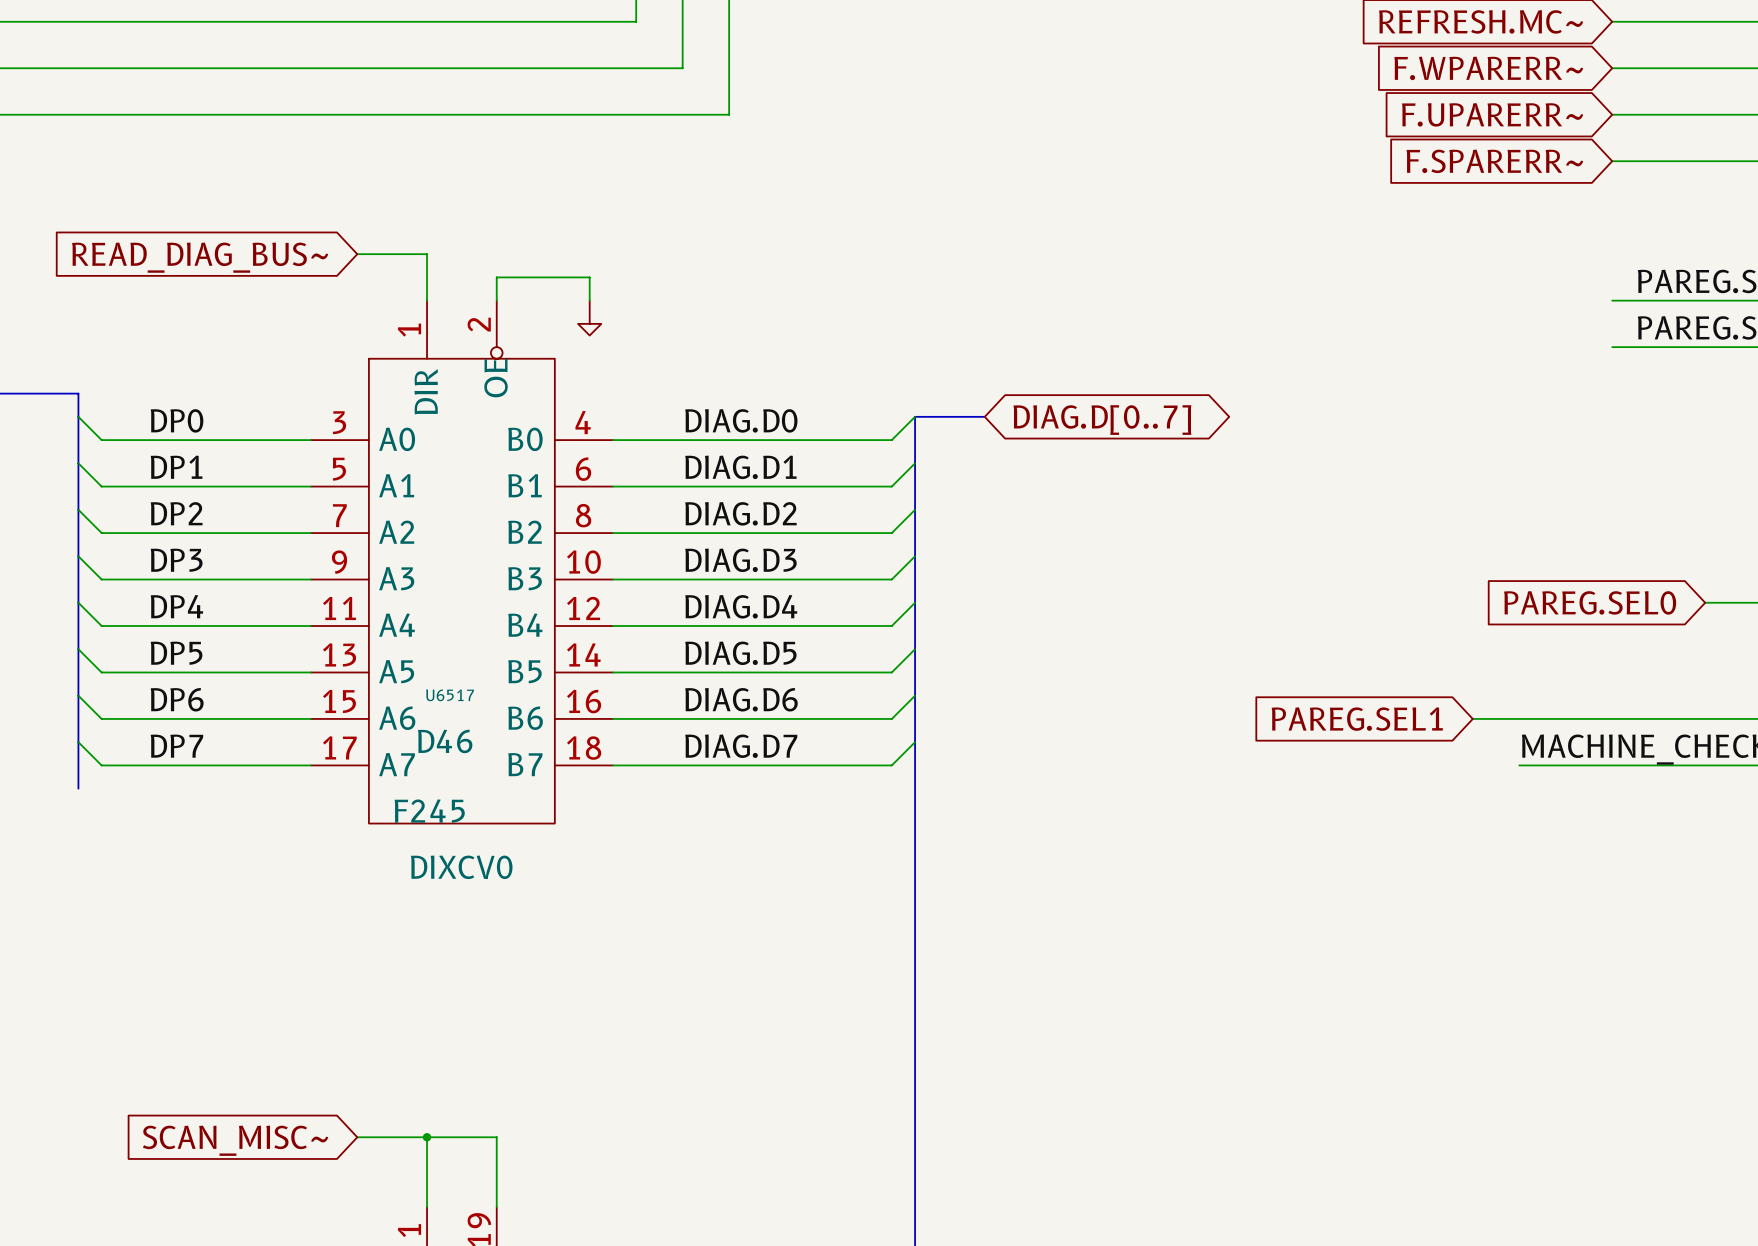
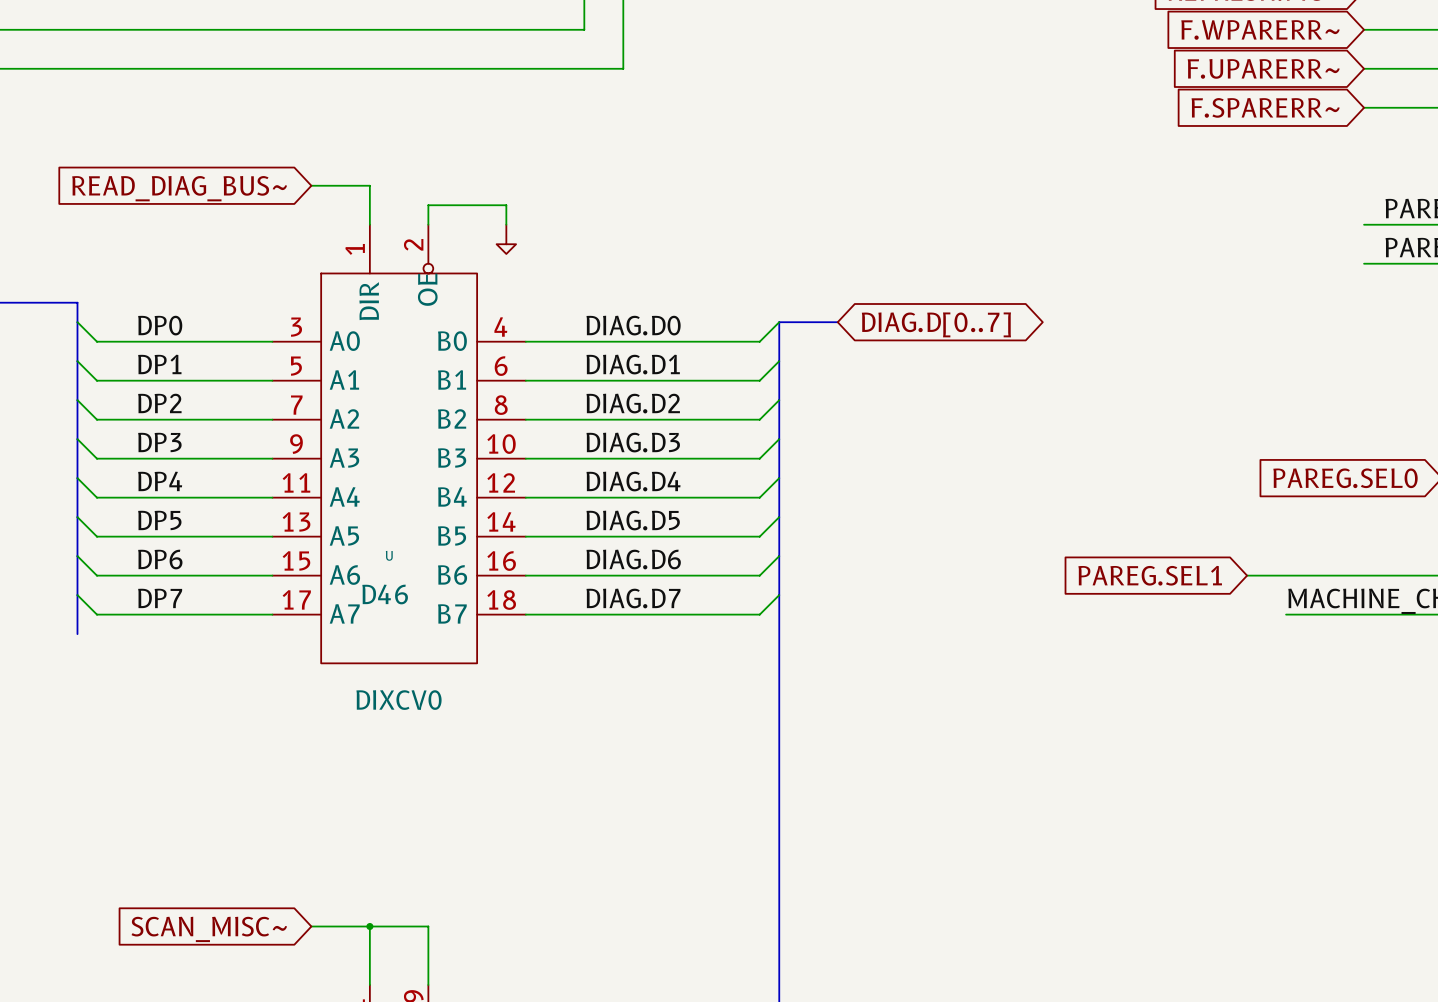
U6517 name: U6517 (450, 695) -> U (389, 555)
U6517 value: F245 (429, 811) -> none

